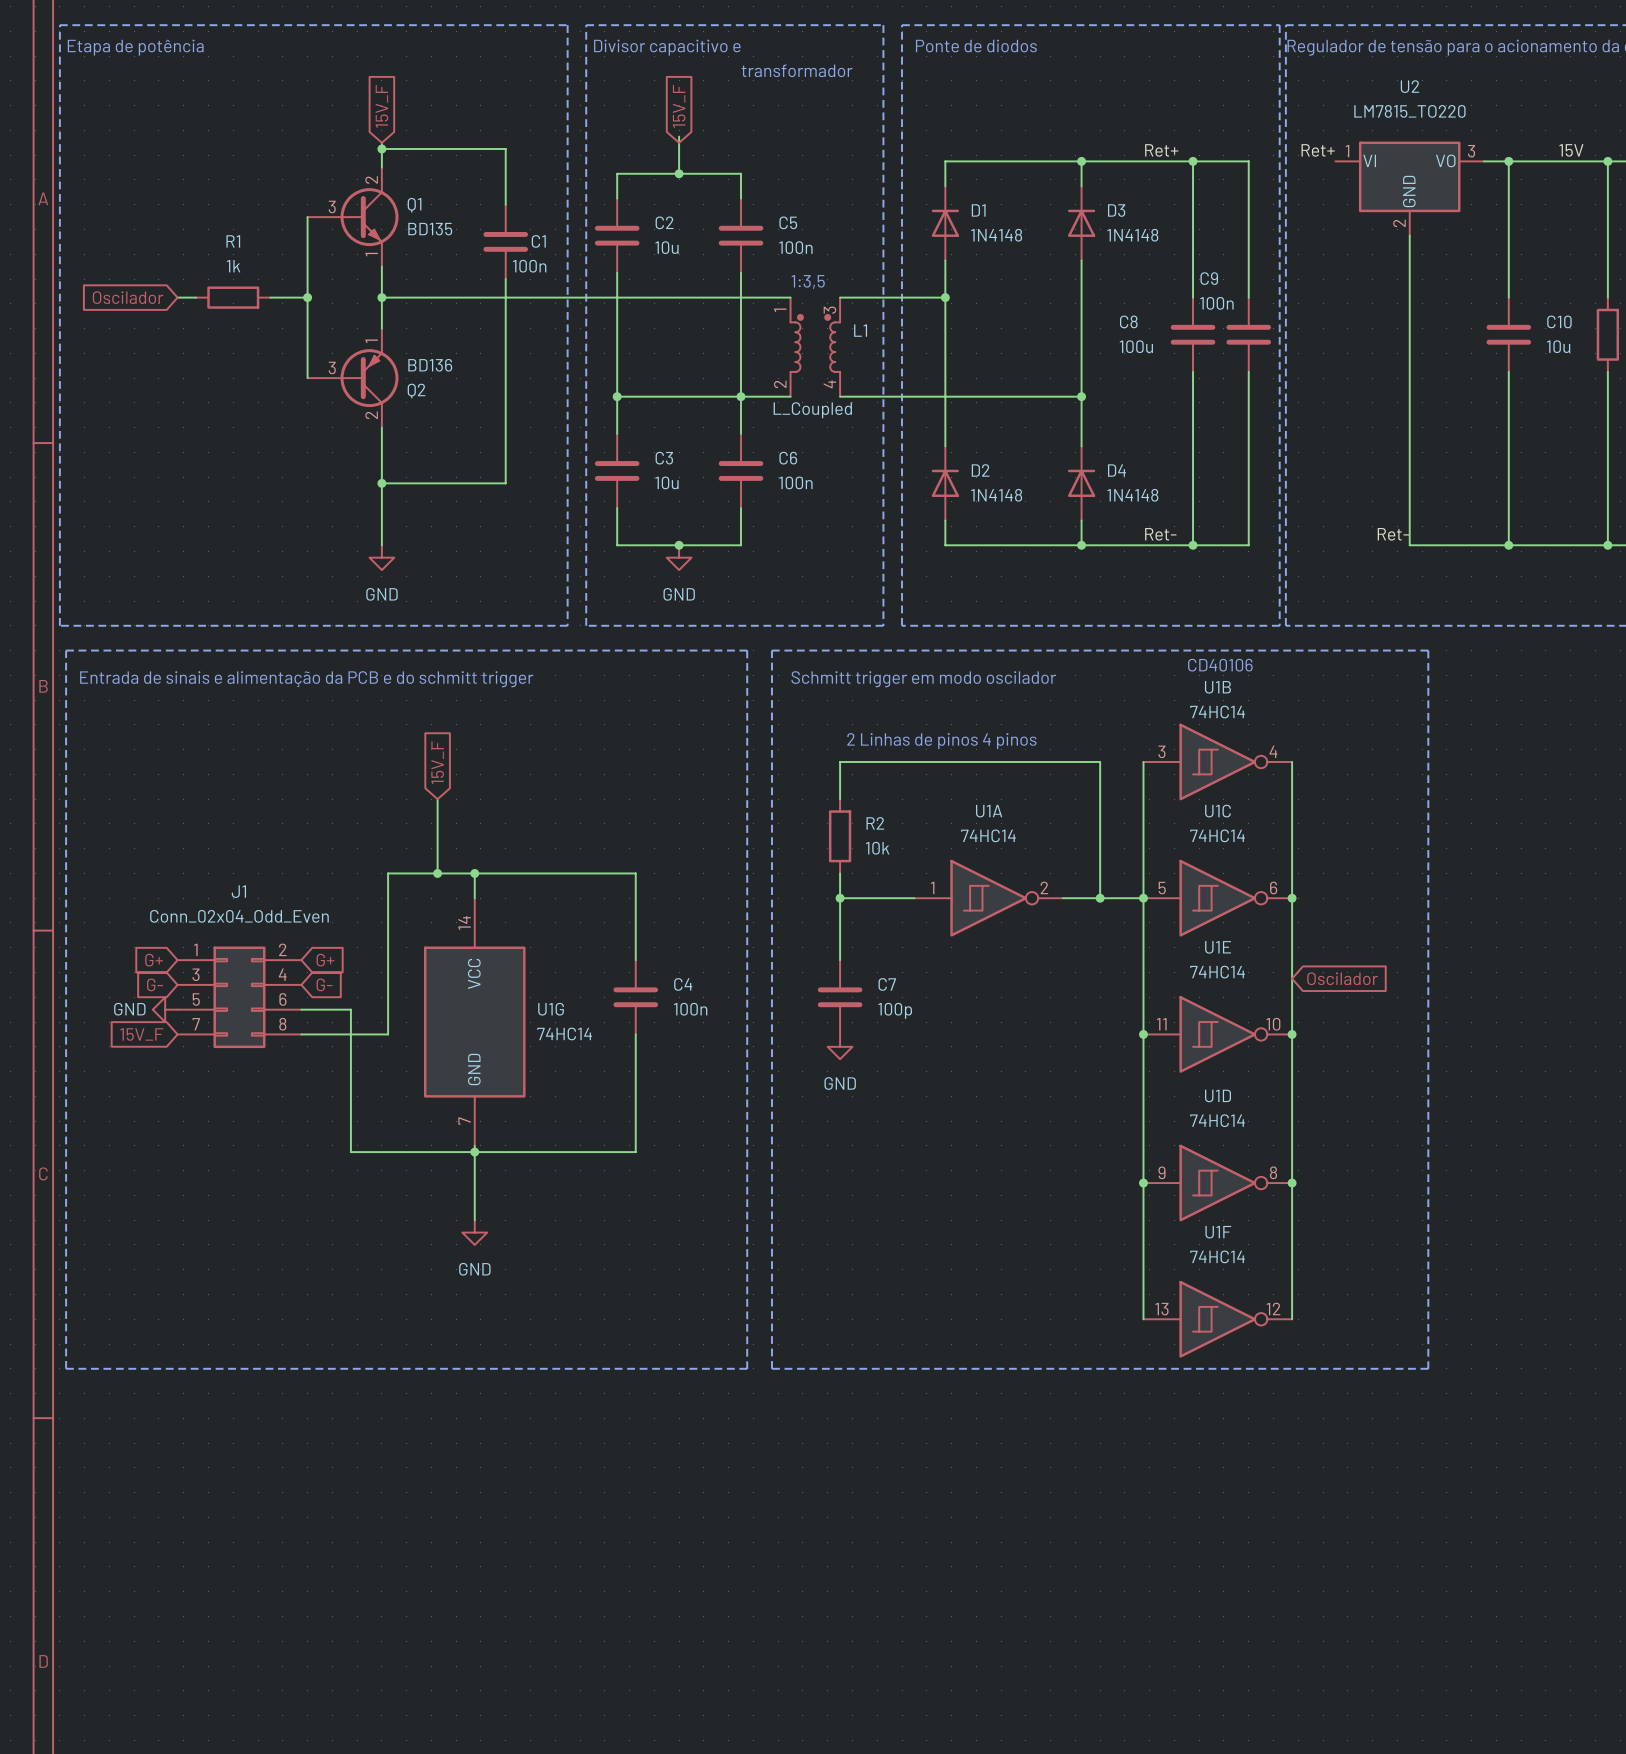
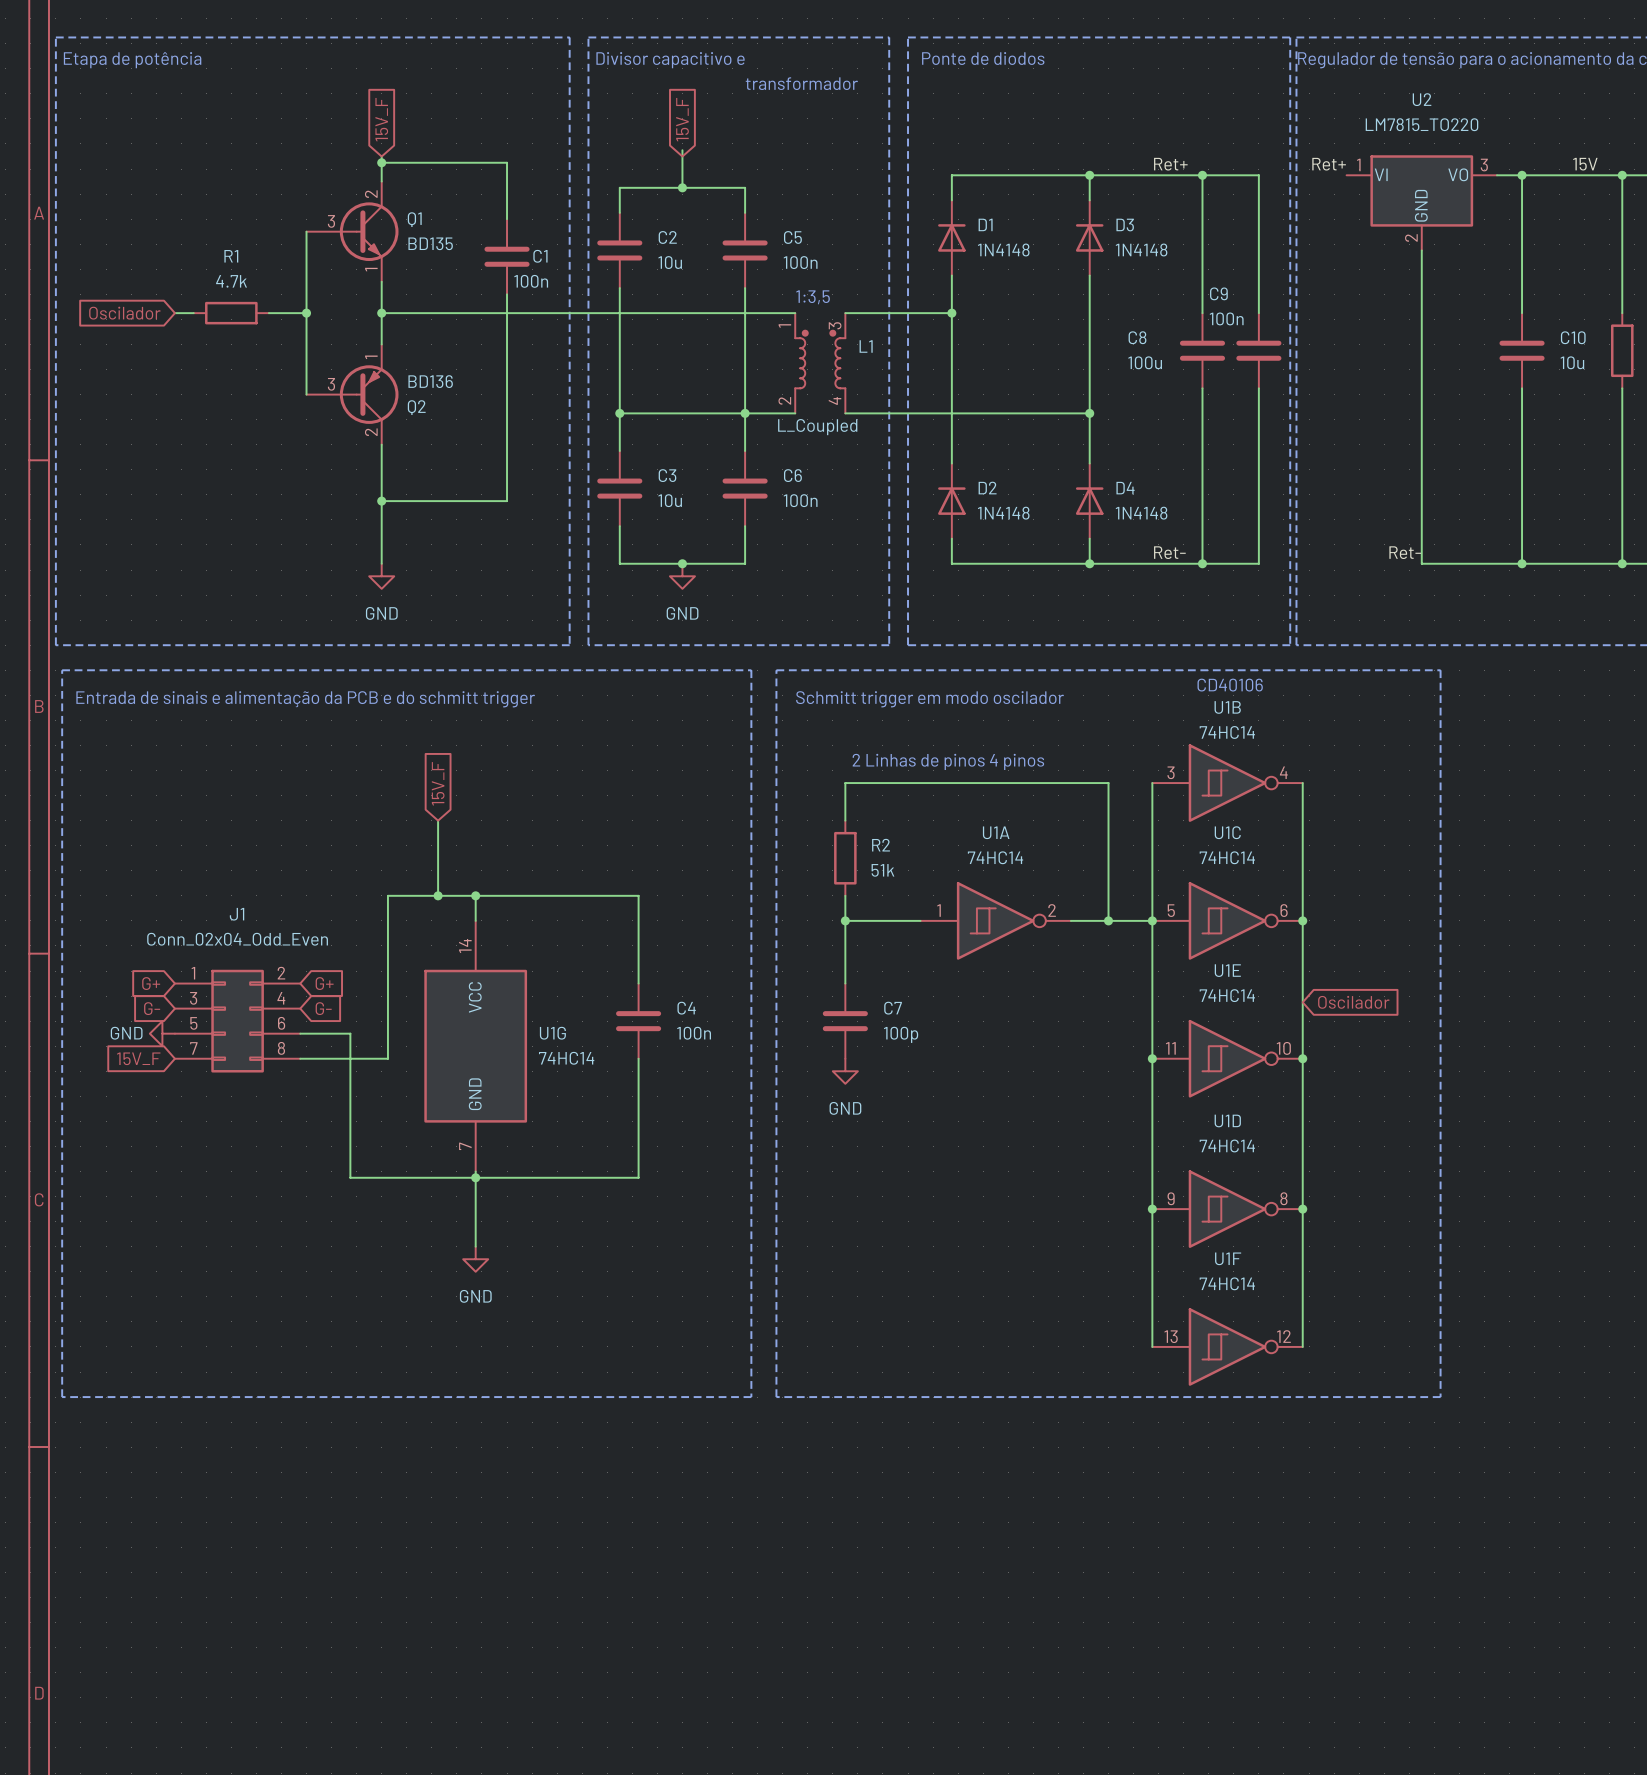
R1 value: 1k (233, 266) -> 4.7k (231, 281)
R2 value: 10k (877, 848) -> 51k (882, 870)

